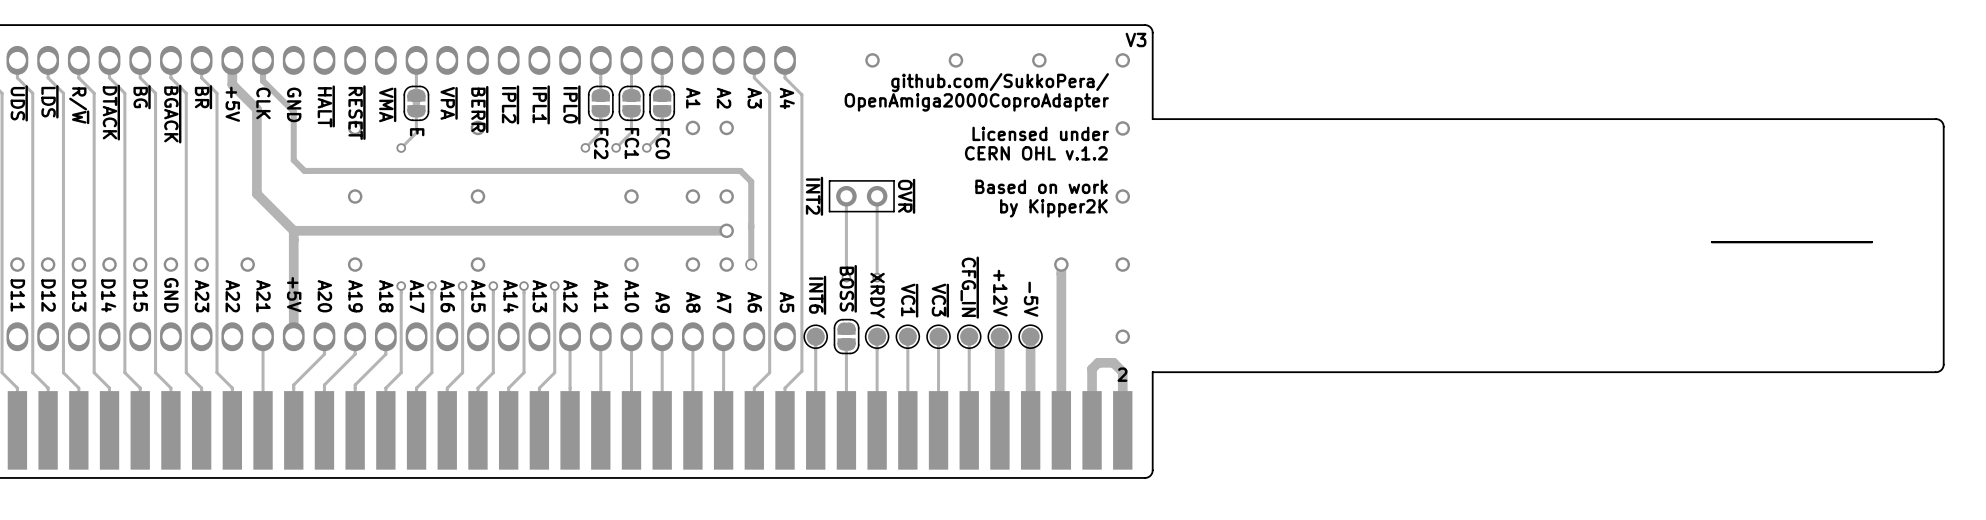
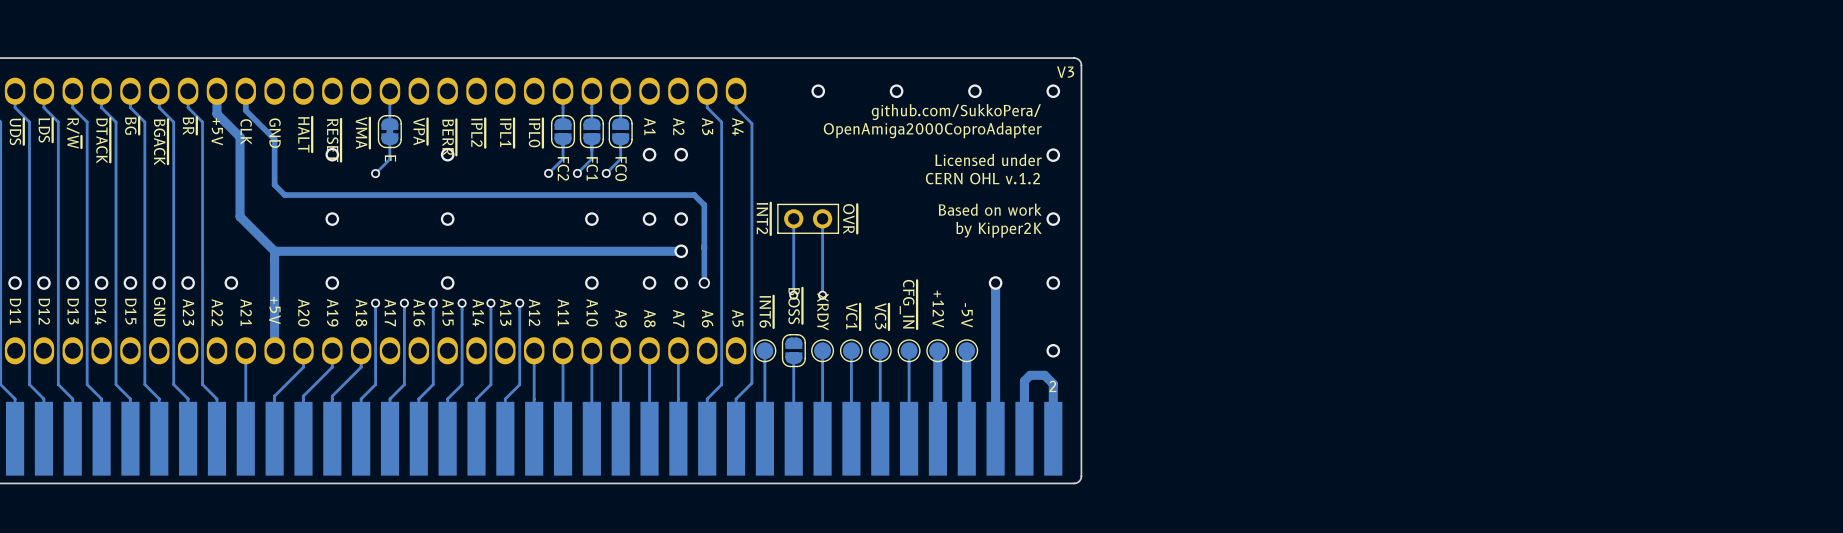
board edge: (1152, 119) (1938, 119) (1943, 126) (1943, 364) (1941, 369) (1936, 372) -> (1081, 146) (1081, 384)
board edge: (1872, 242) (1711, 242) (1872, 242) -> none
board edge: (1935, 372) (1152, 372) -> none

